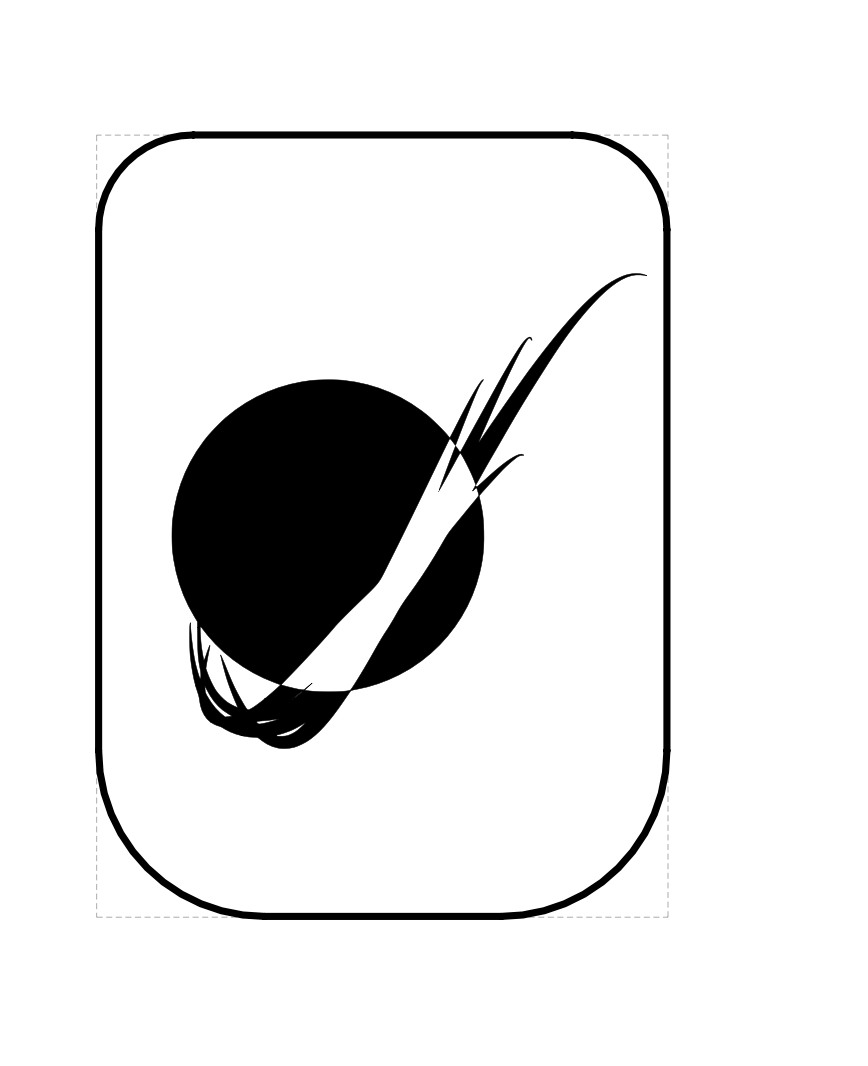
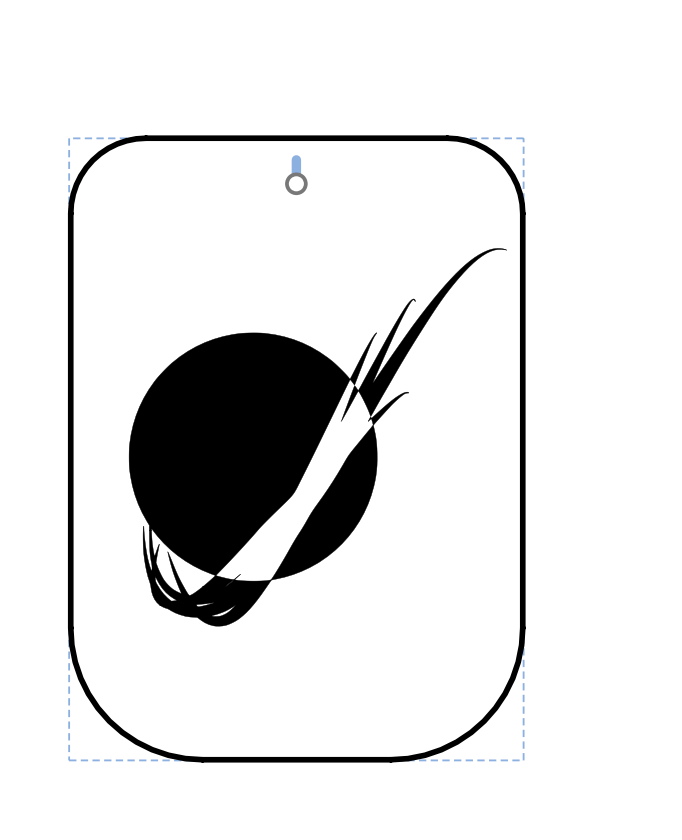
track: none -> (296, 159) (296, 183)
via: none -> (296, 183)

